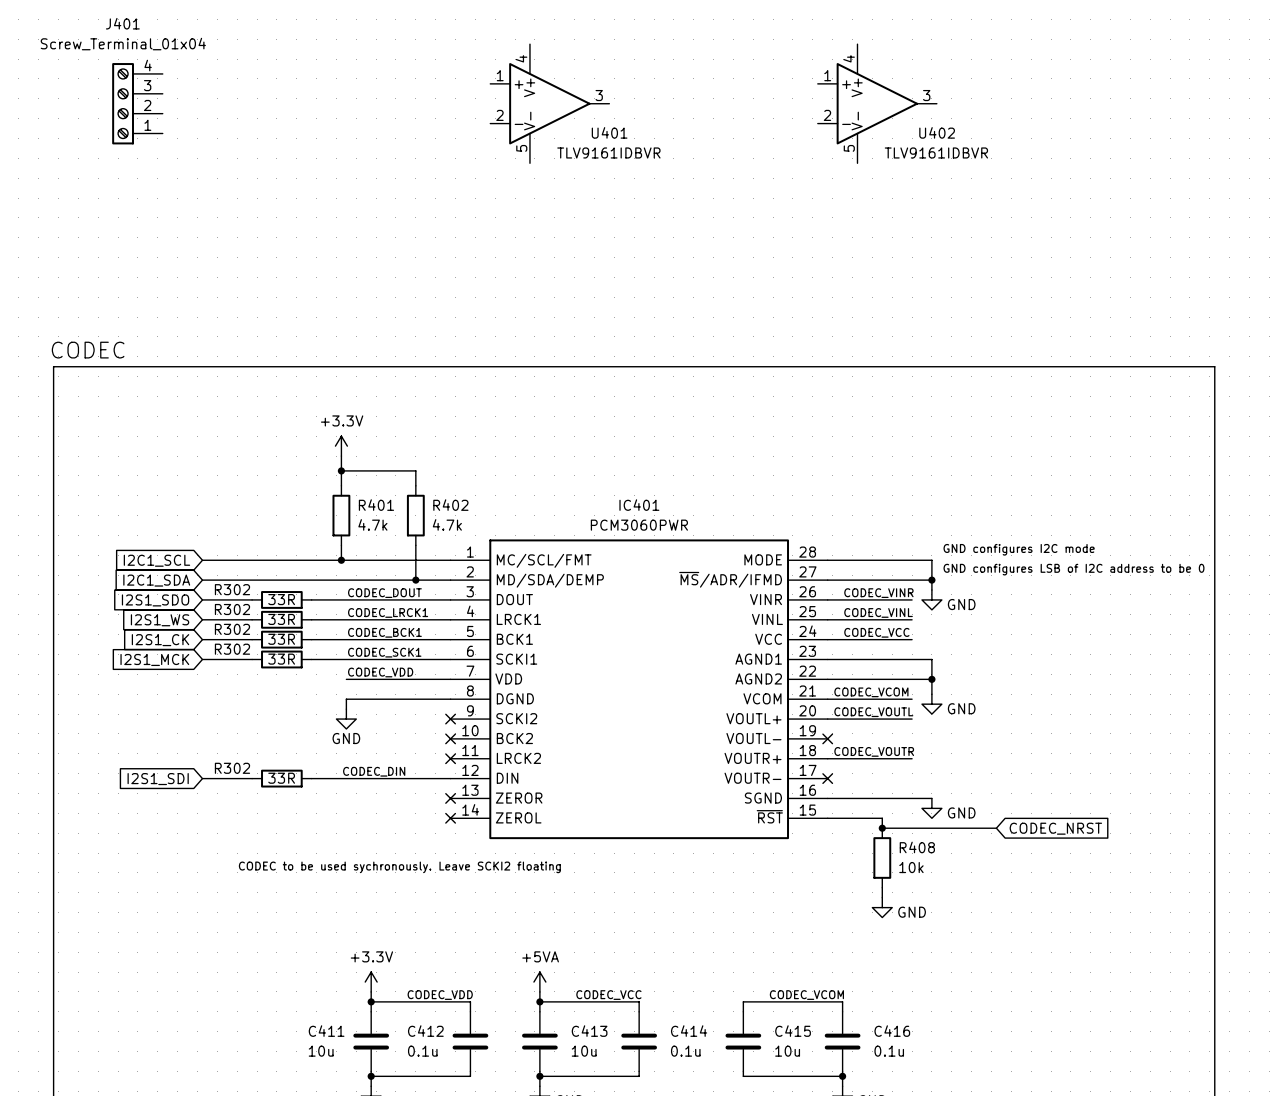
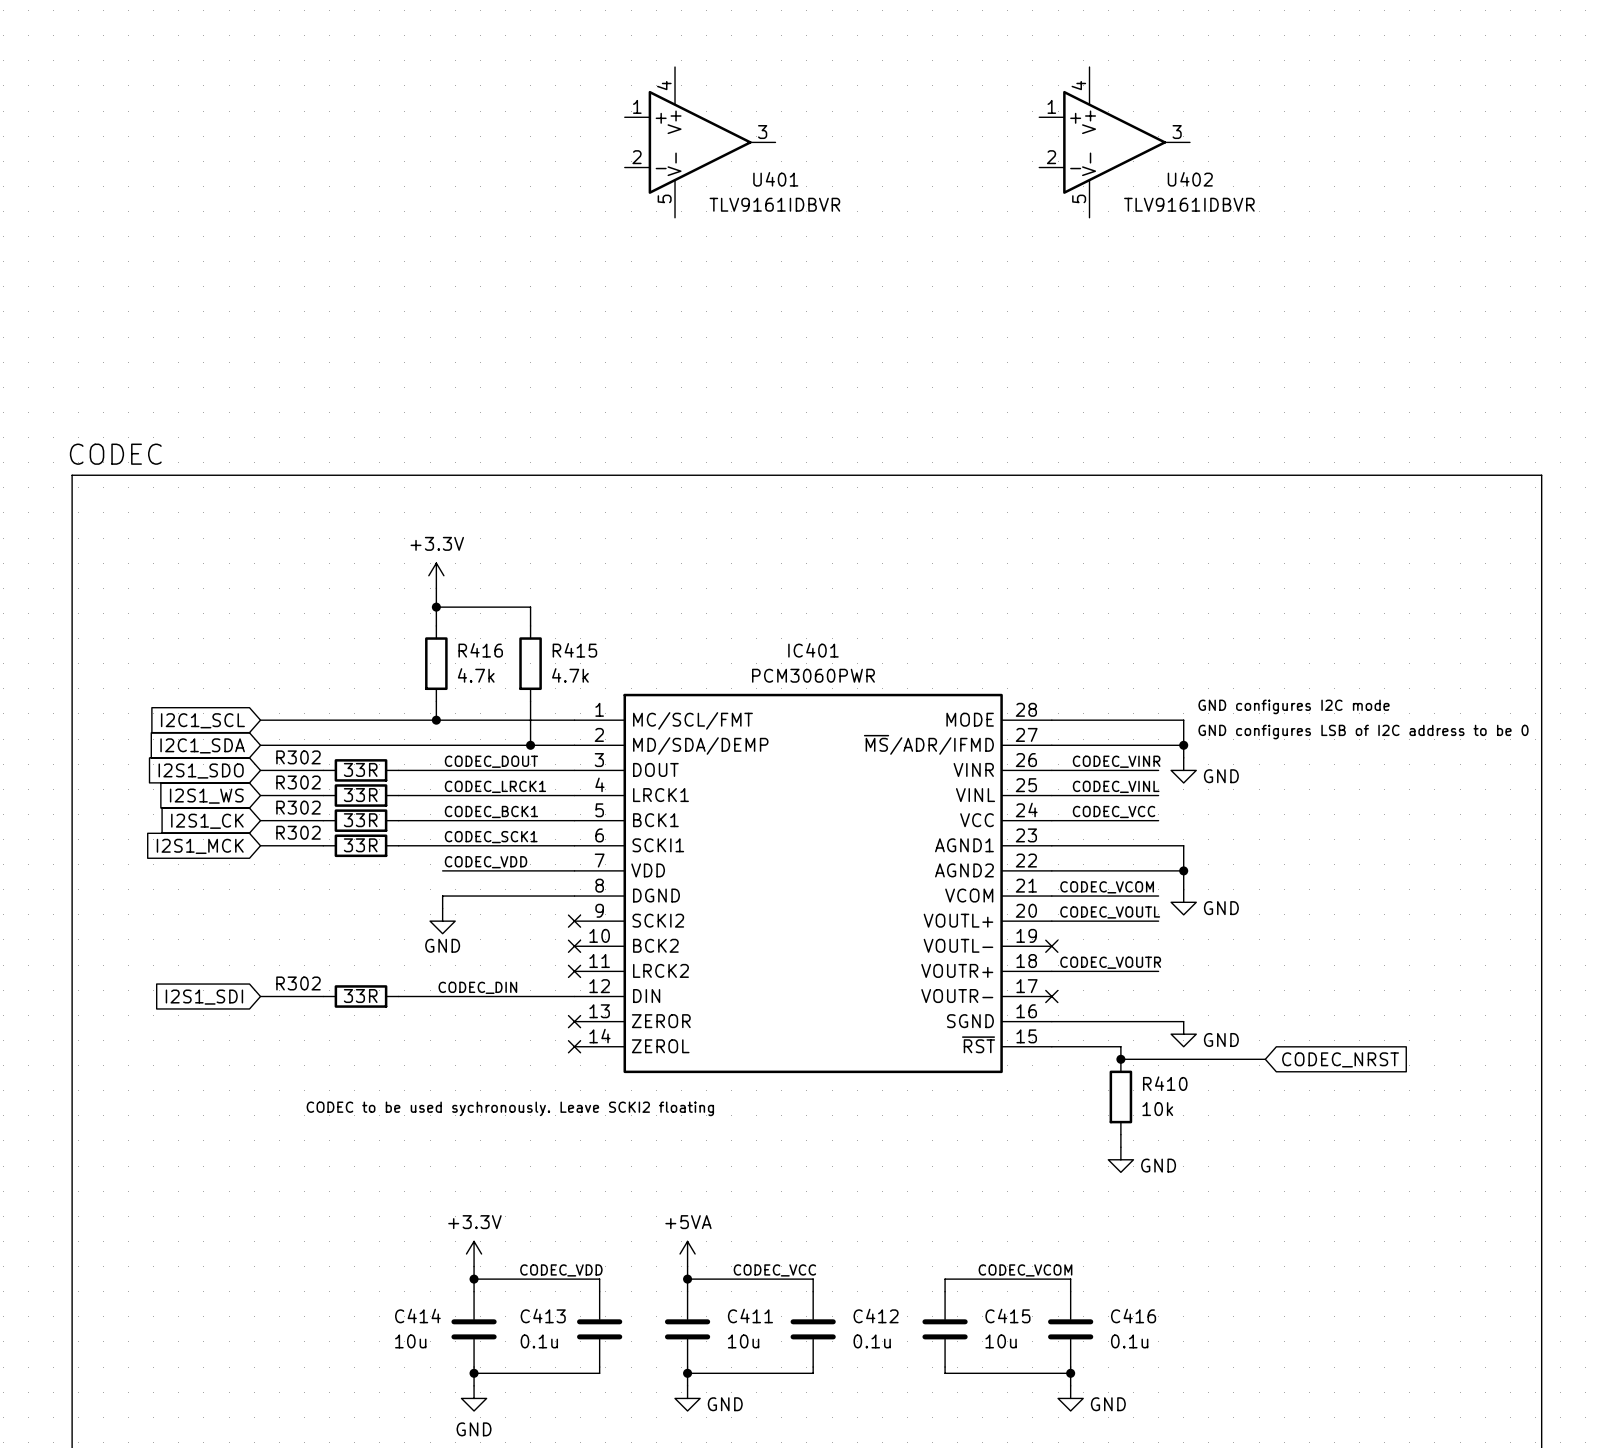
J401: Screw_Terminal_01x04 (137, 103) -> none
R401 name: R401 (376, 505) -> R416 (480, 650)
R402 name: R402 (450, 505) -> R415 (574, 650)
R408 name: R408 (917, 847) -> R410 (1165, 1083)
C411 name: C411 (326, 1031) -> C414 (417, 1316)
C412 name: C412 (425, 1031) -> C413 (543, 1316)
C413 name: C413 (589, 1031) -> C411 (750, 1316)
C414 name: C414 (689, 1031) -> C412 (876, 1316)

